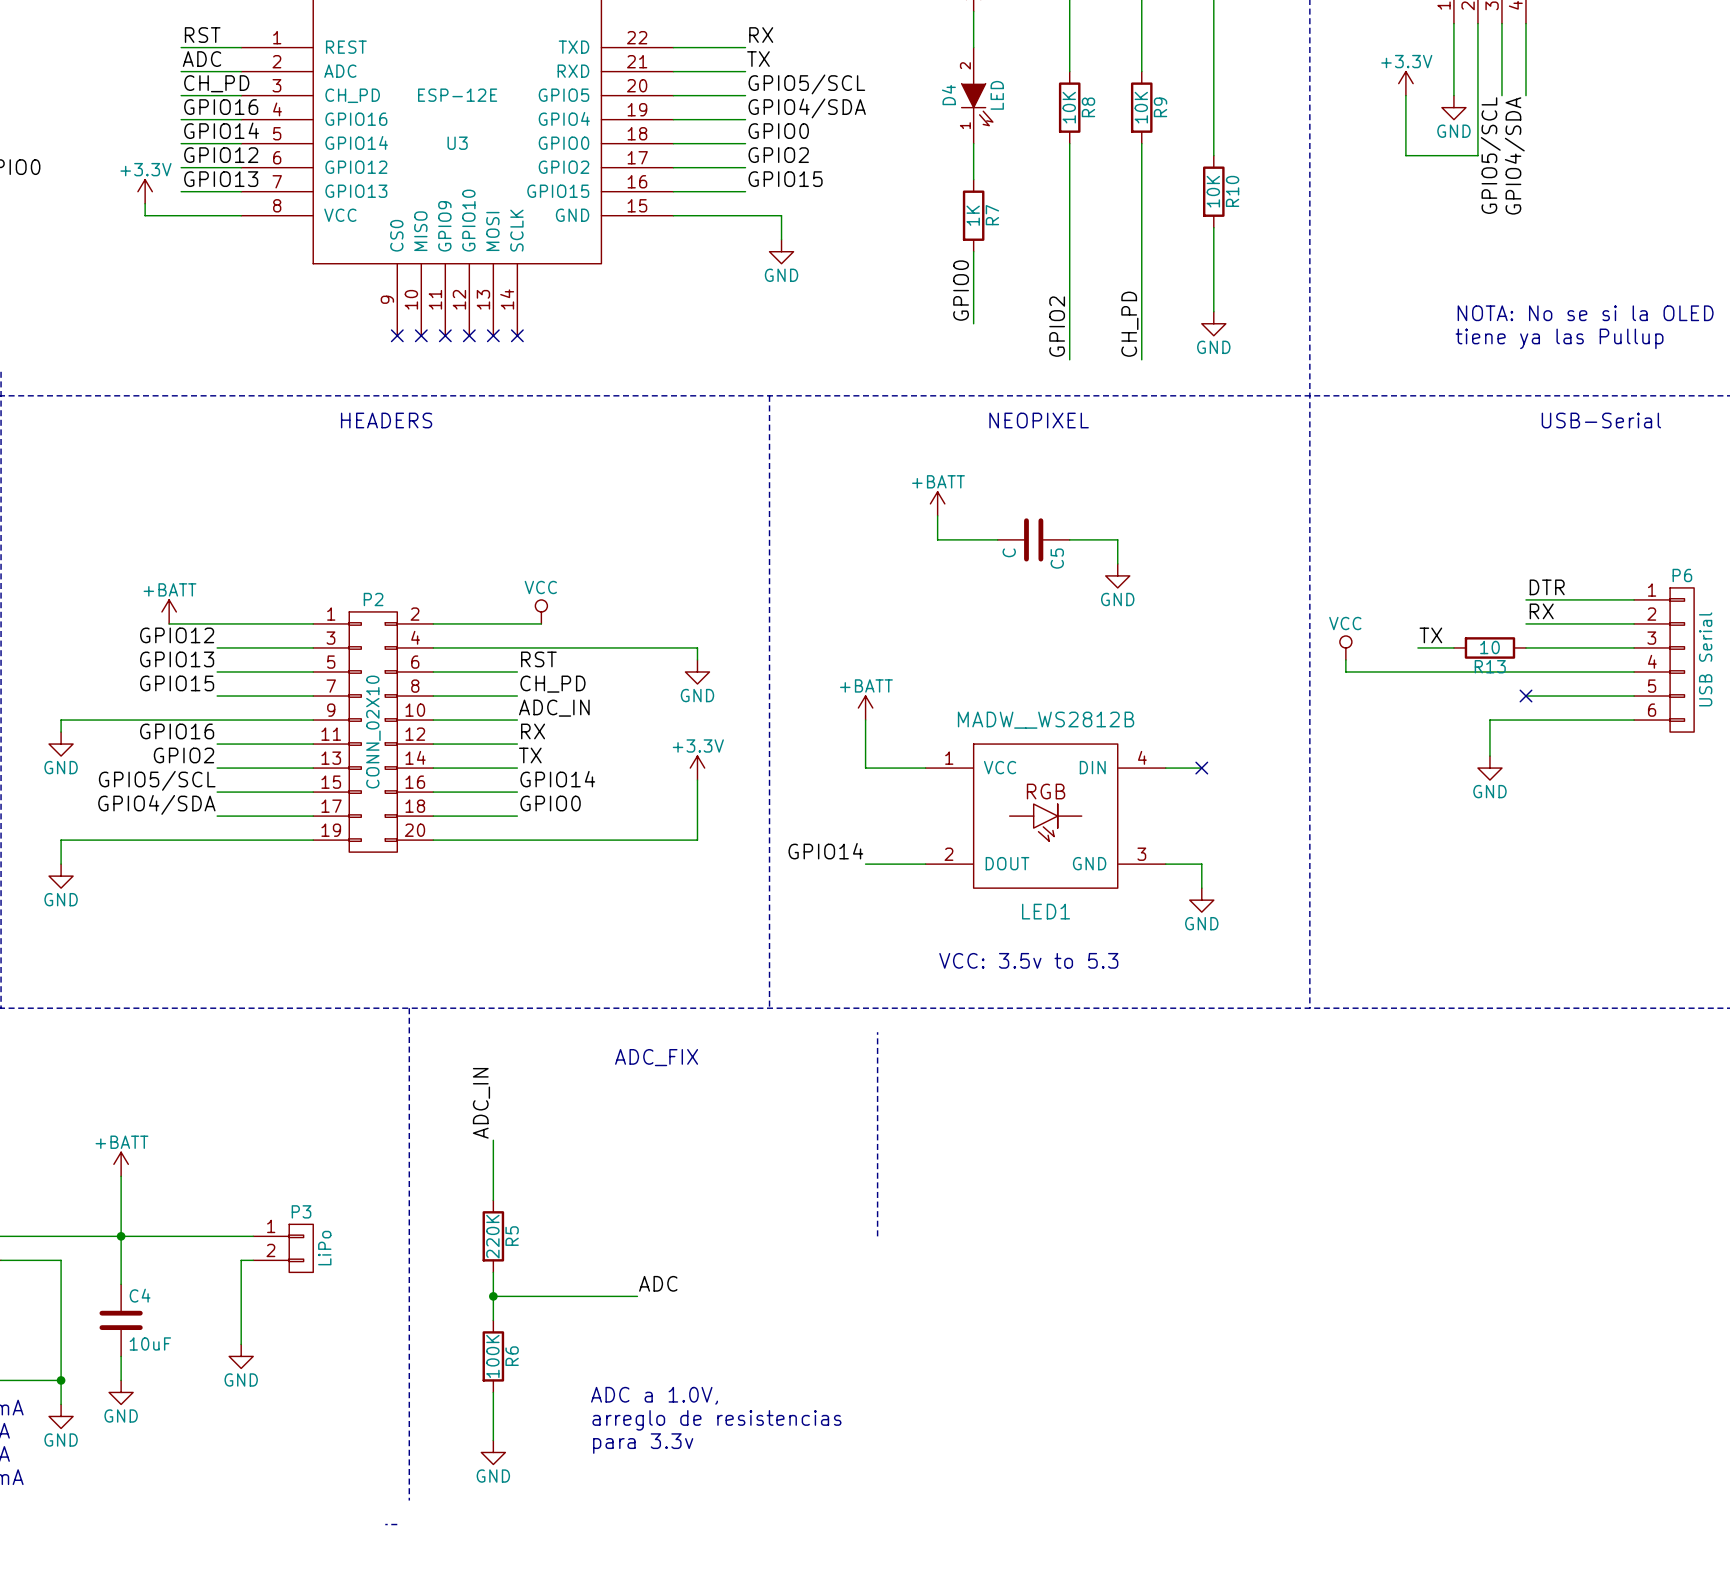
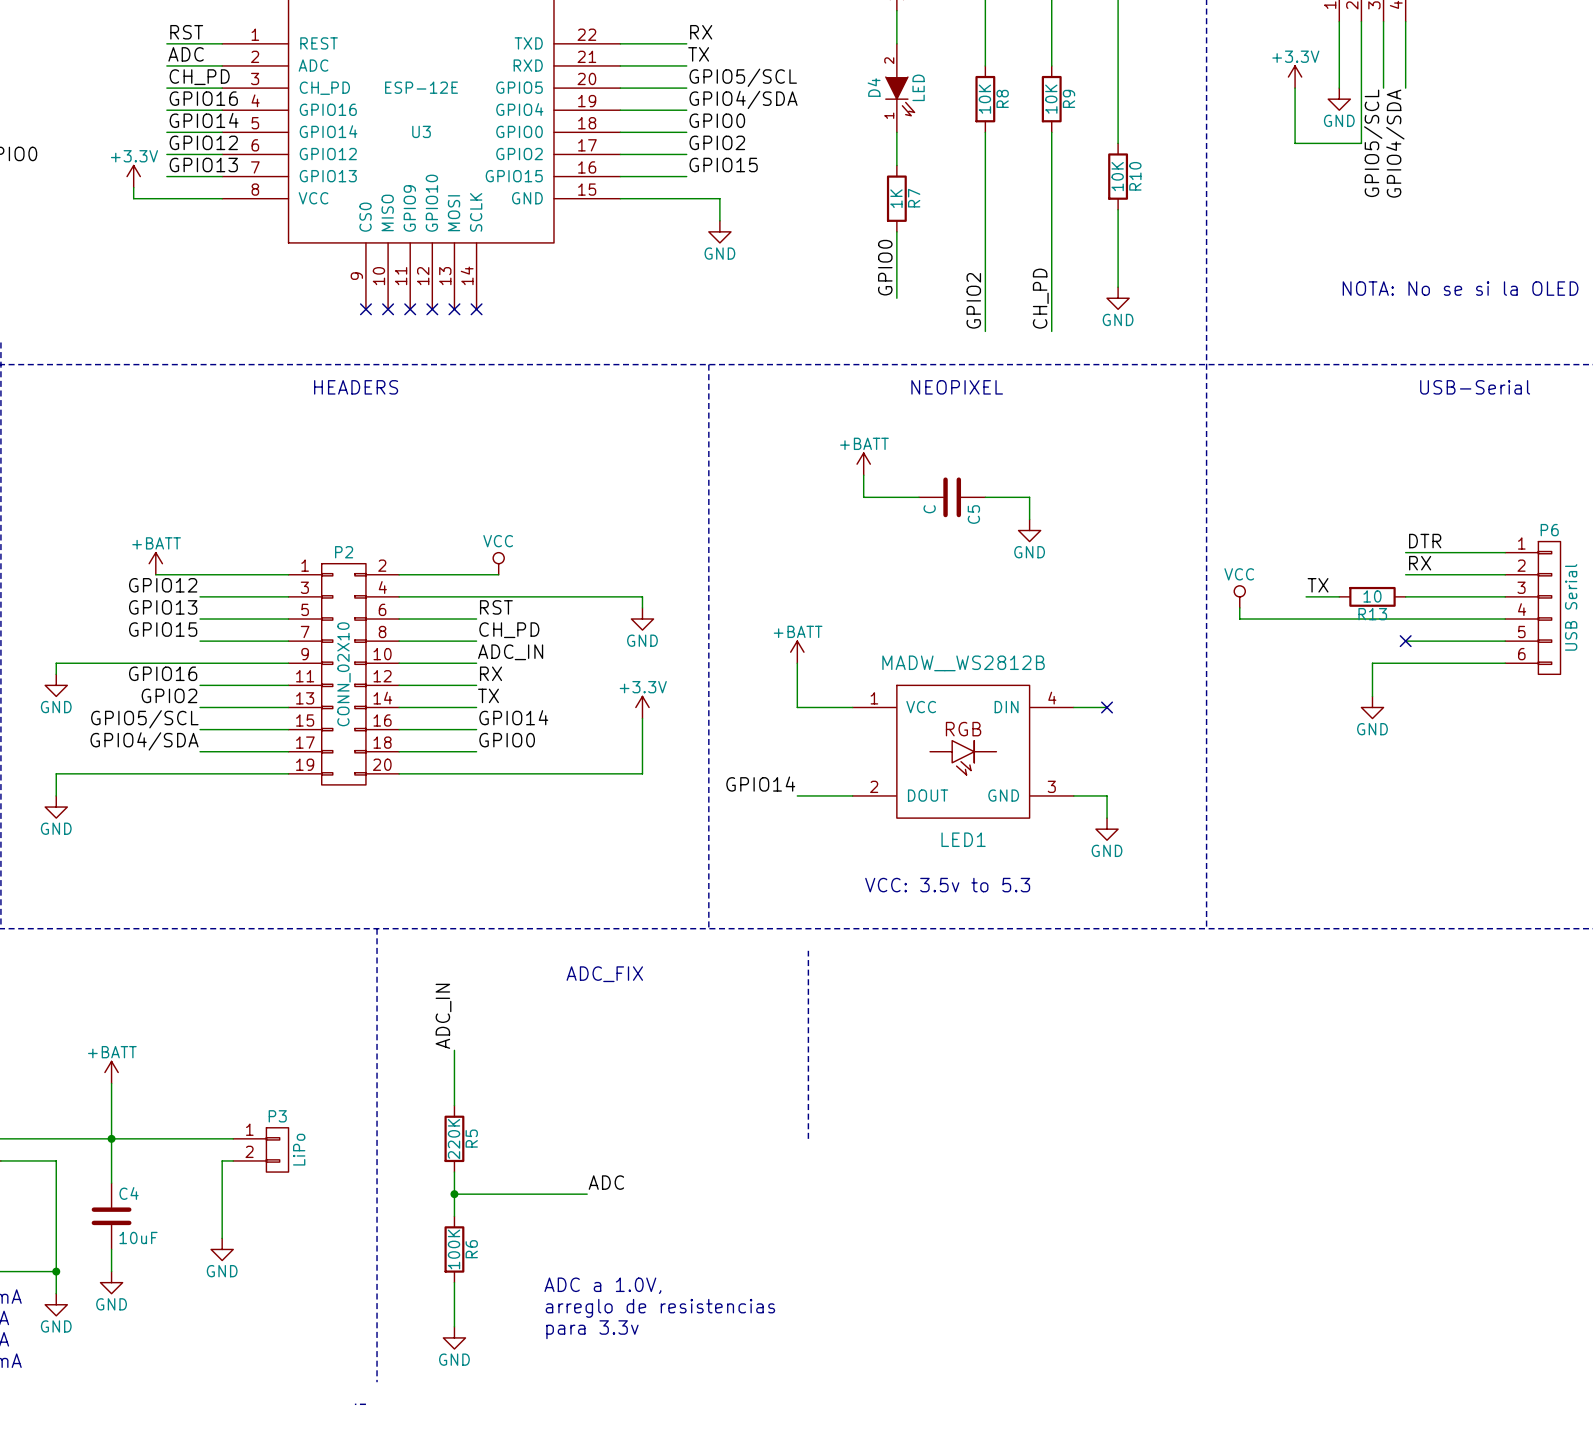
text: tiene ya las Pullup (1559, 338) -> none

